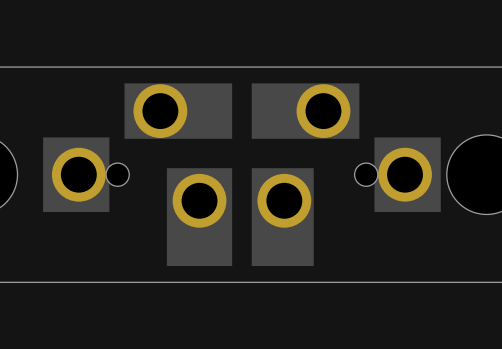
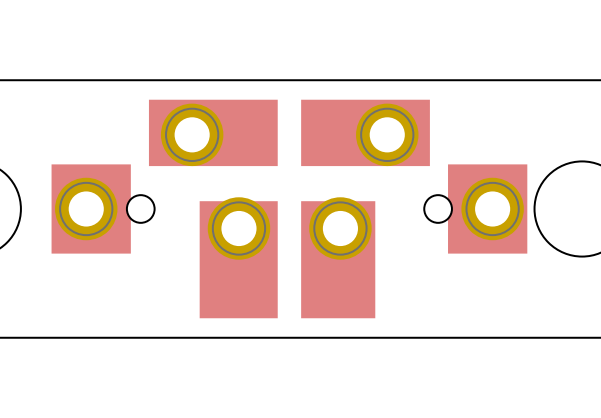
via: (160, 111) -> none
via: (323, 111) -> none
part: none -> (192, 134)
part: none -> (387, 134)
part: none -> (86, 208)
via: (78, 174) -> none
via: (405, 174) -> none
part: none -> (492, 208)
part: none -> (238, 228)
part: none -> (340, 228)
via: (199, 200) -> none
via: (284, 200) -> none

